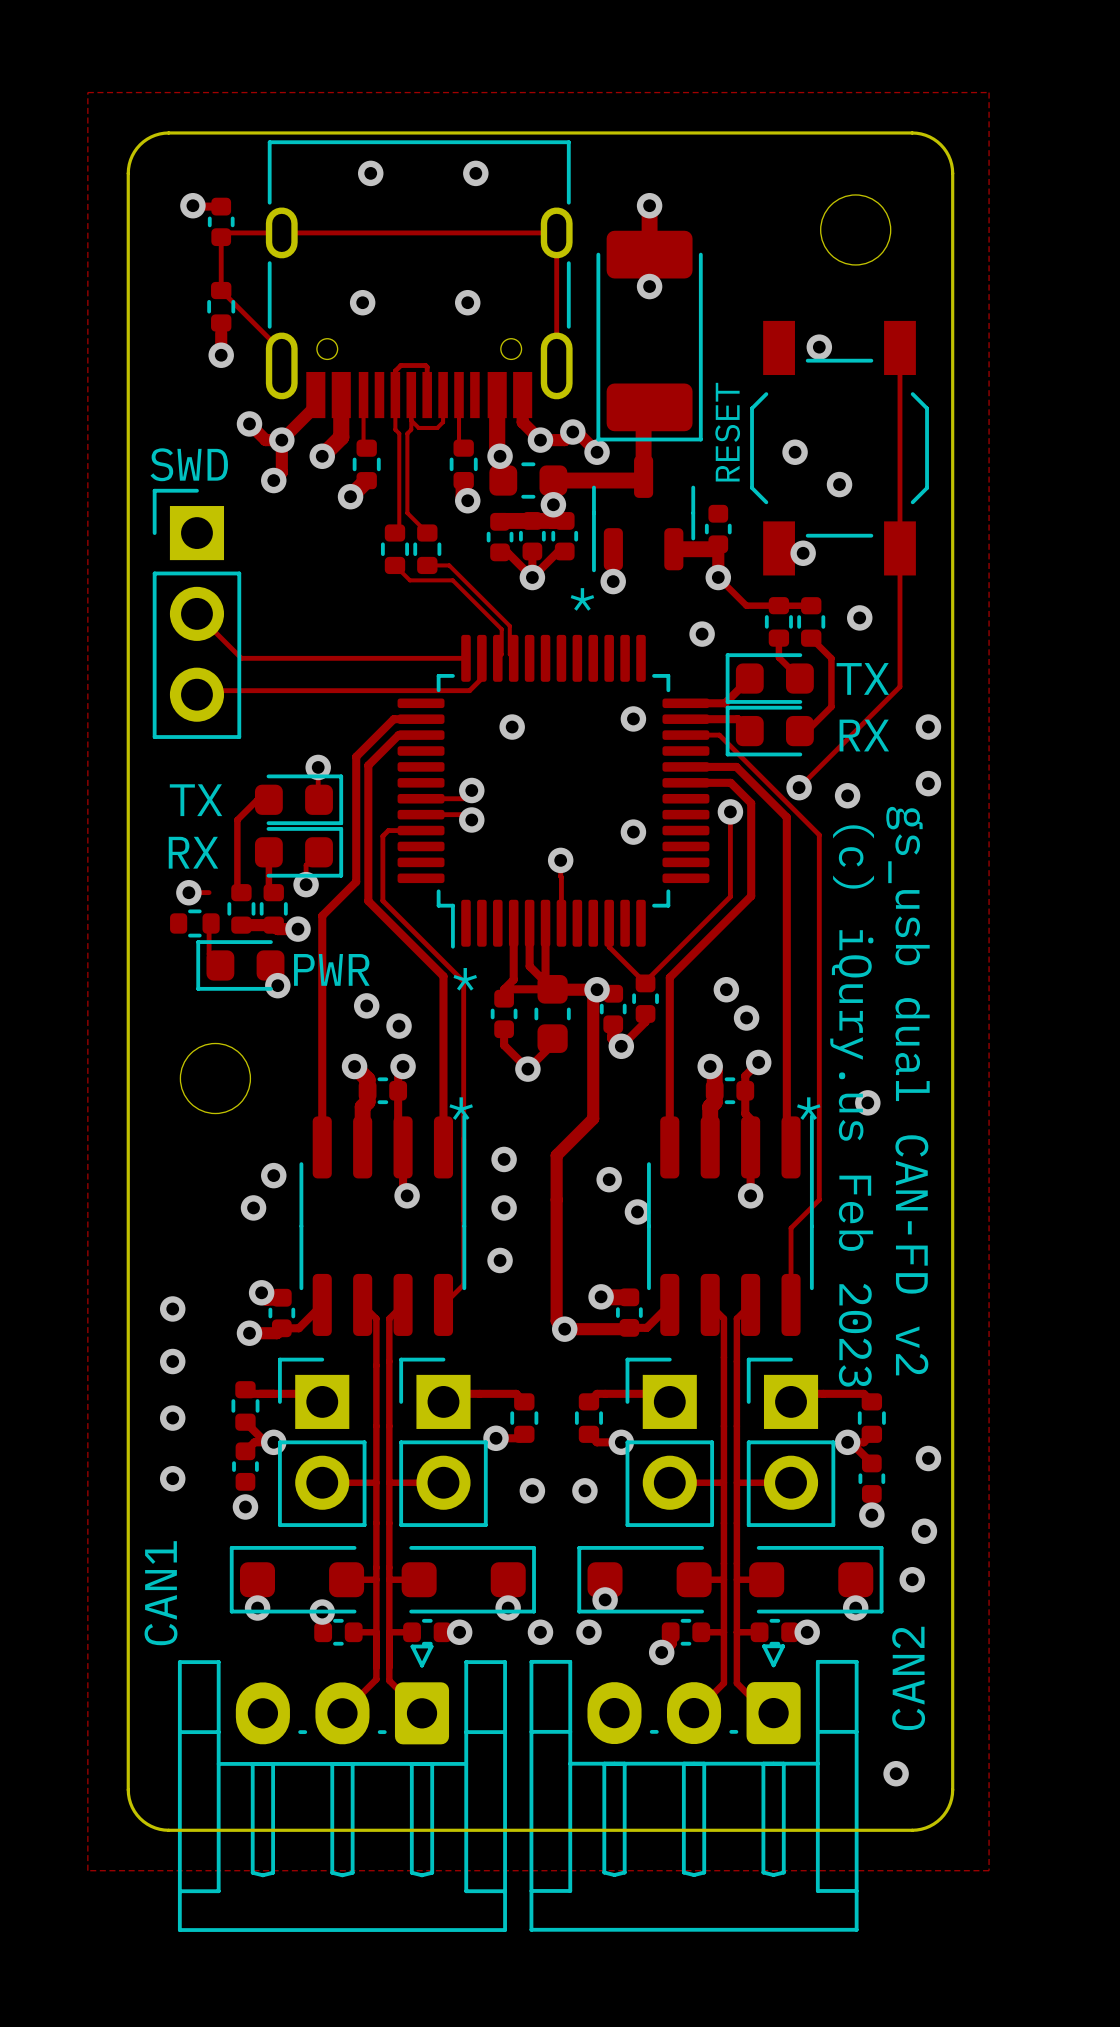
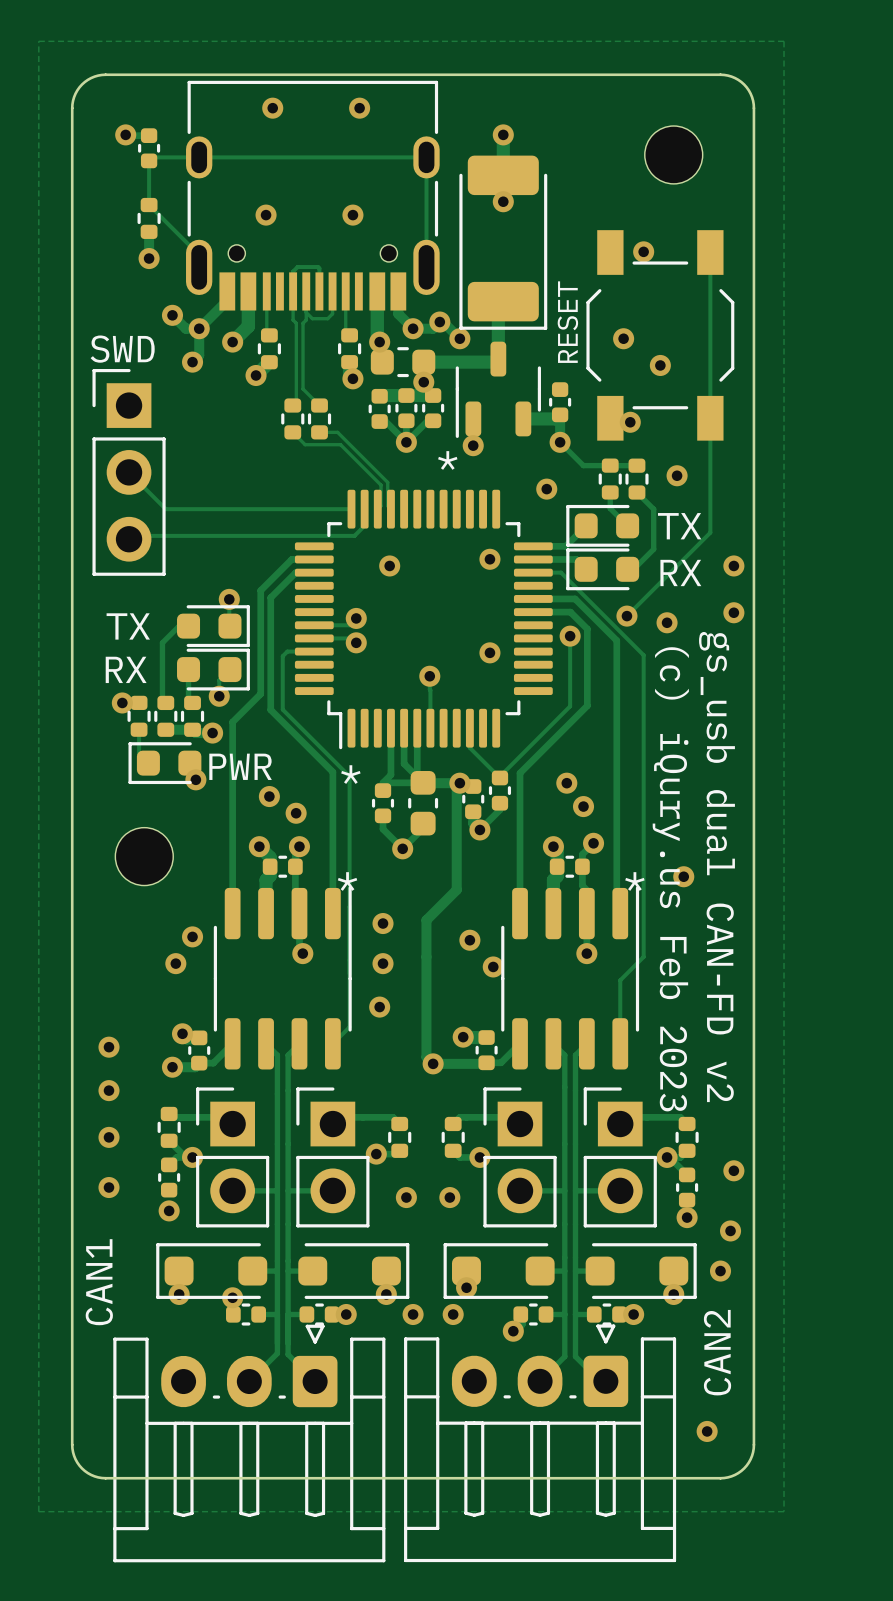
part rotation: 0° (194, 923) -> 90° clockwise (139, 716)

